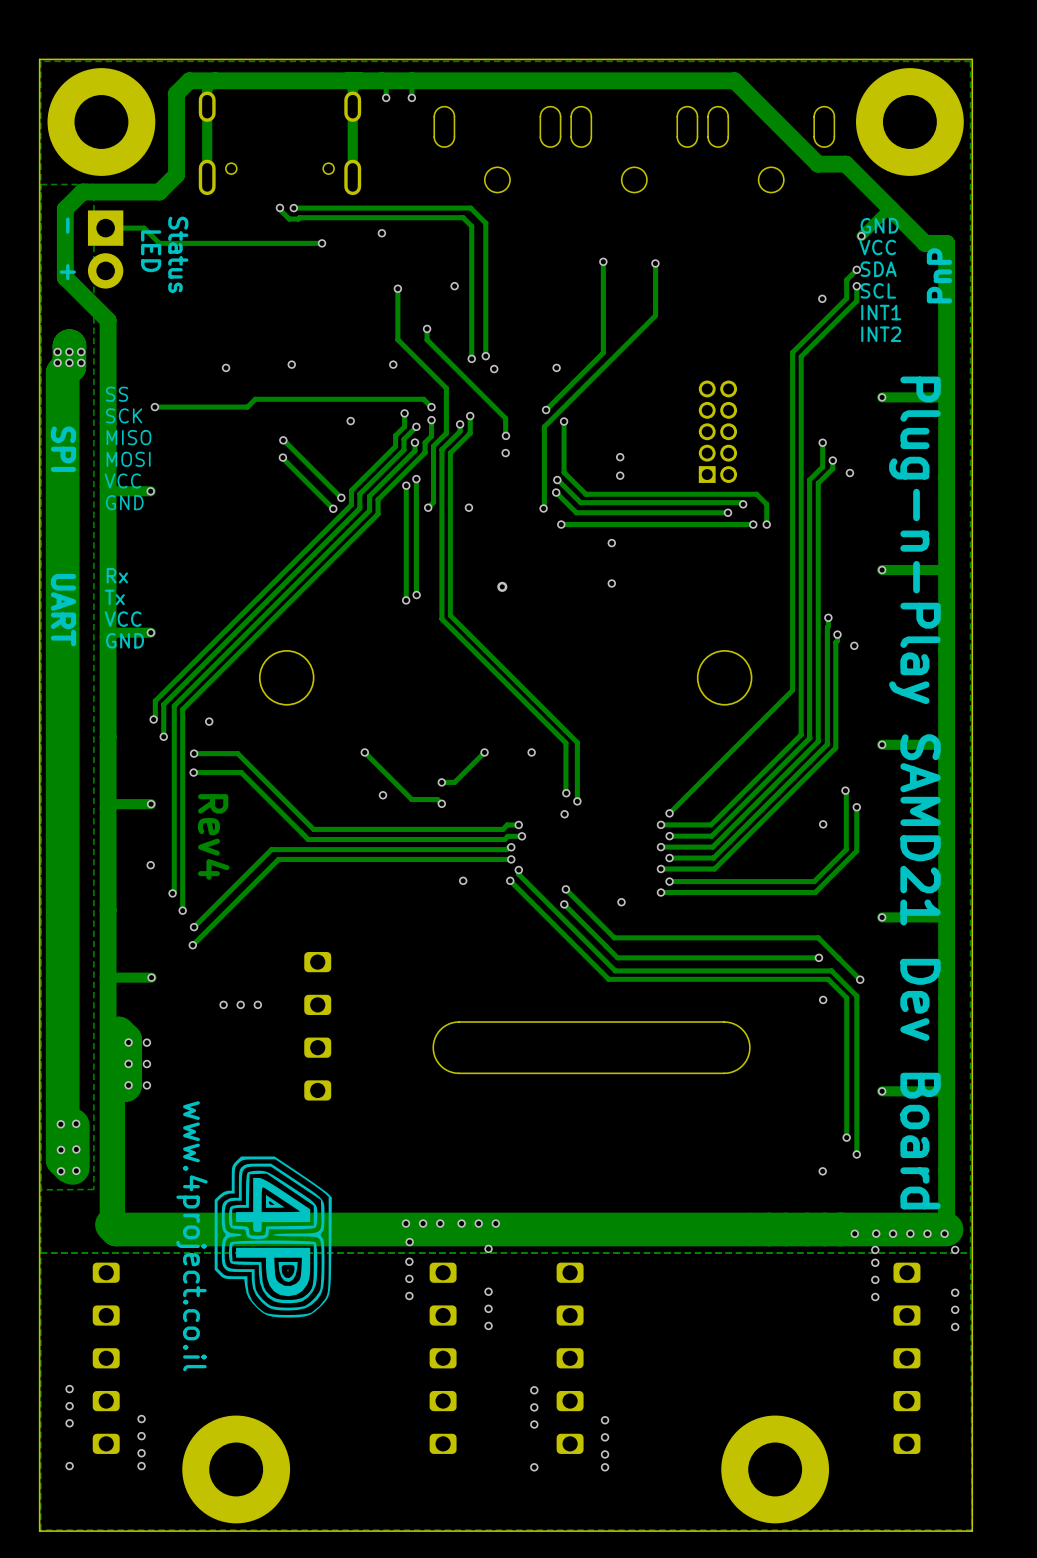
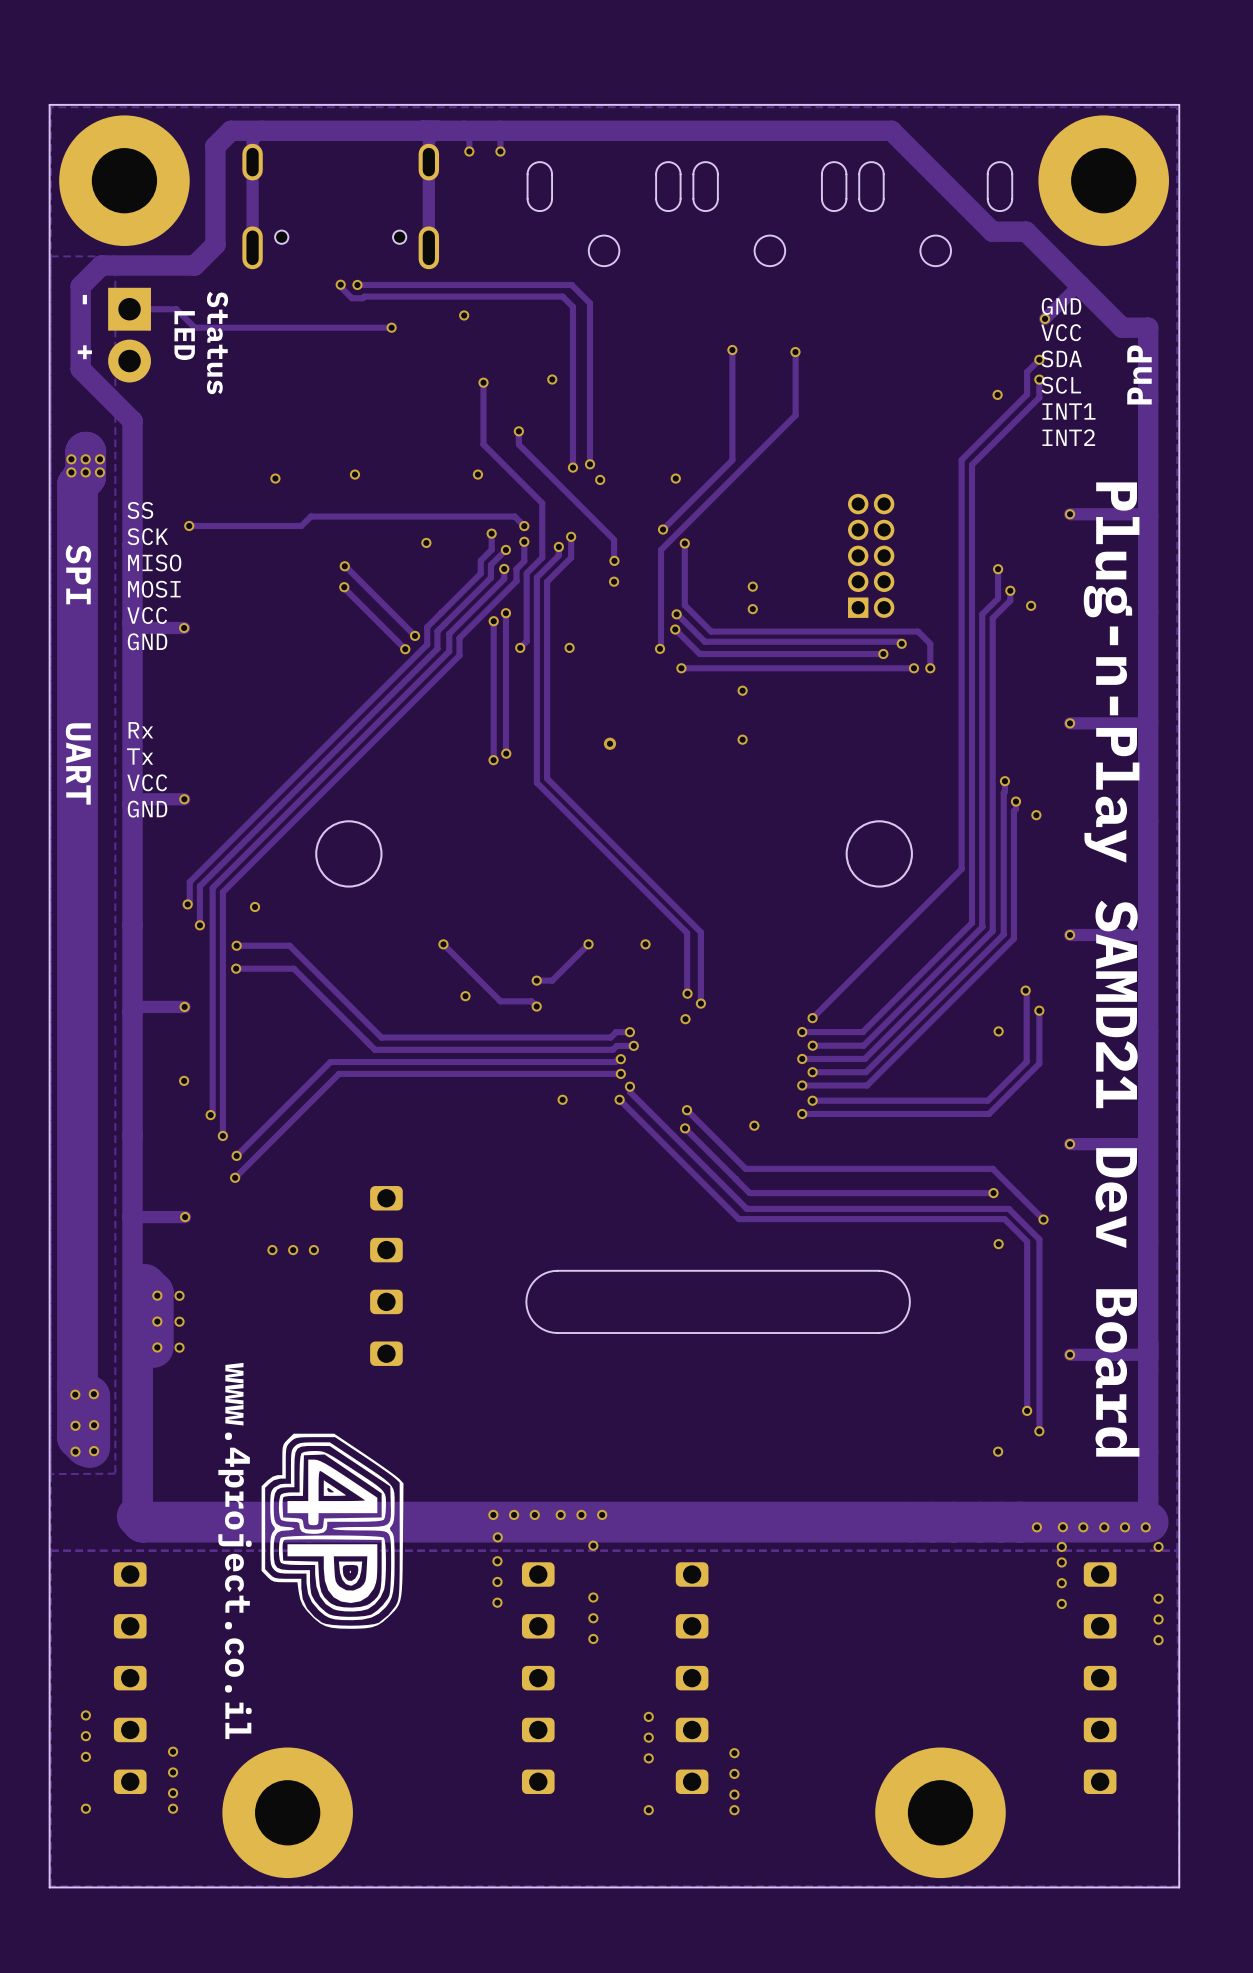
text: Rev4 (213, 836) -> none

